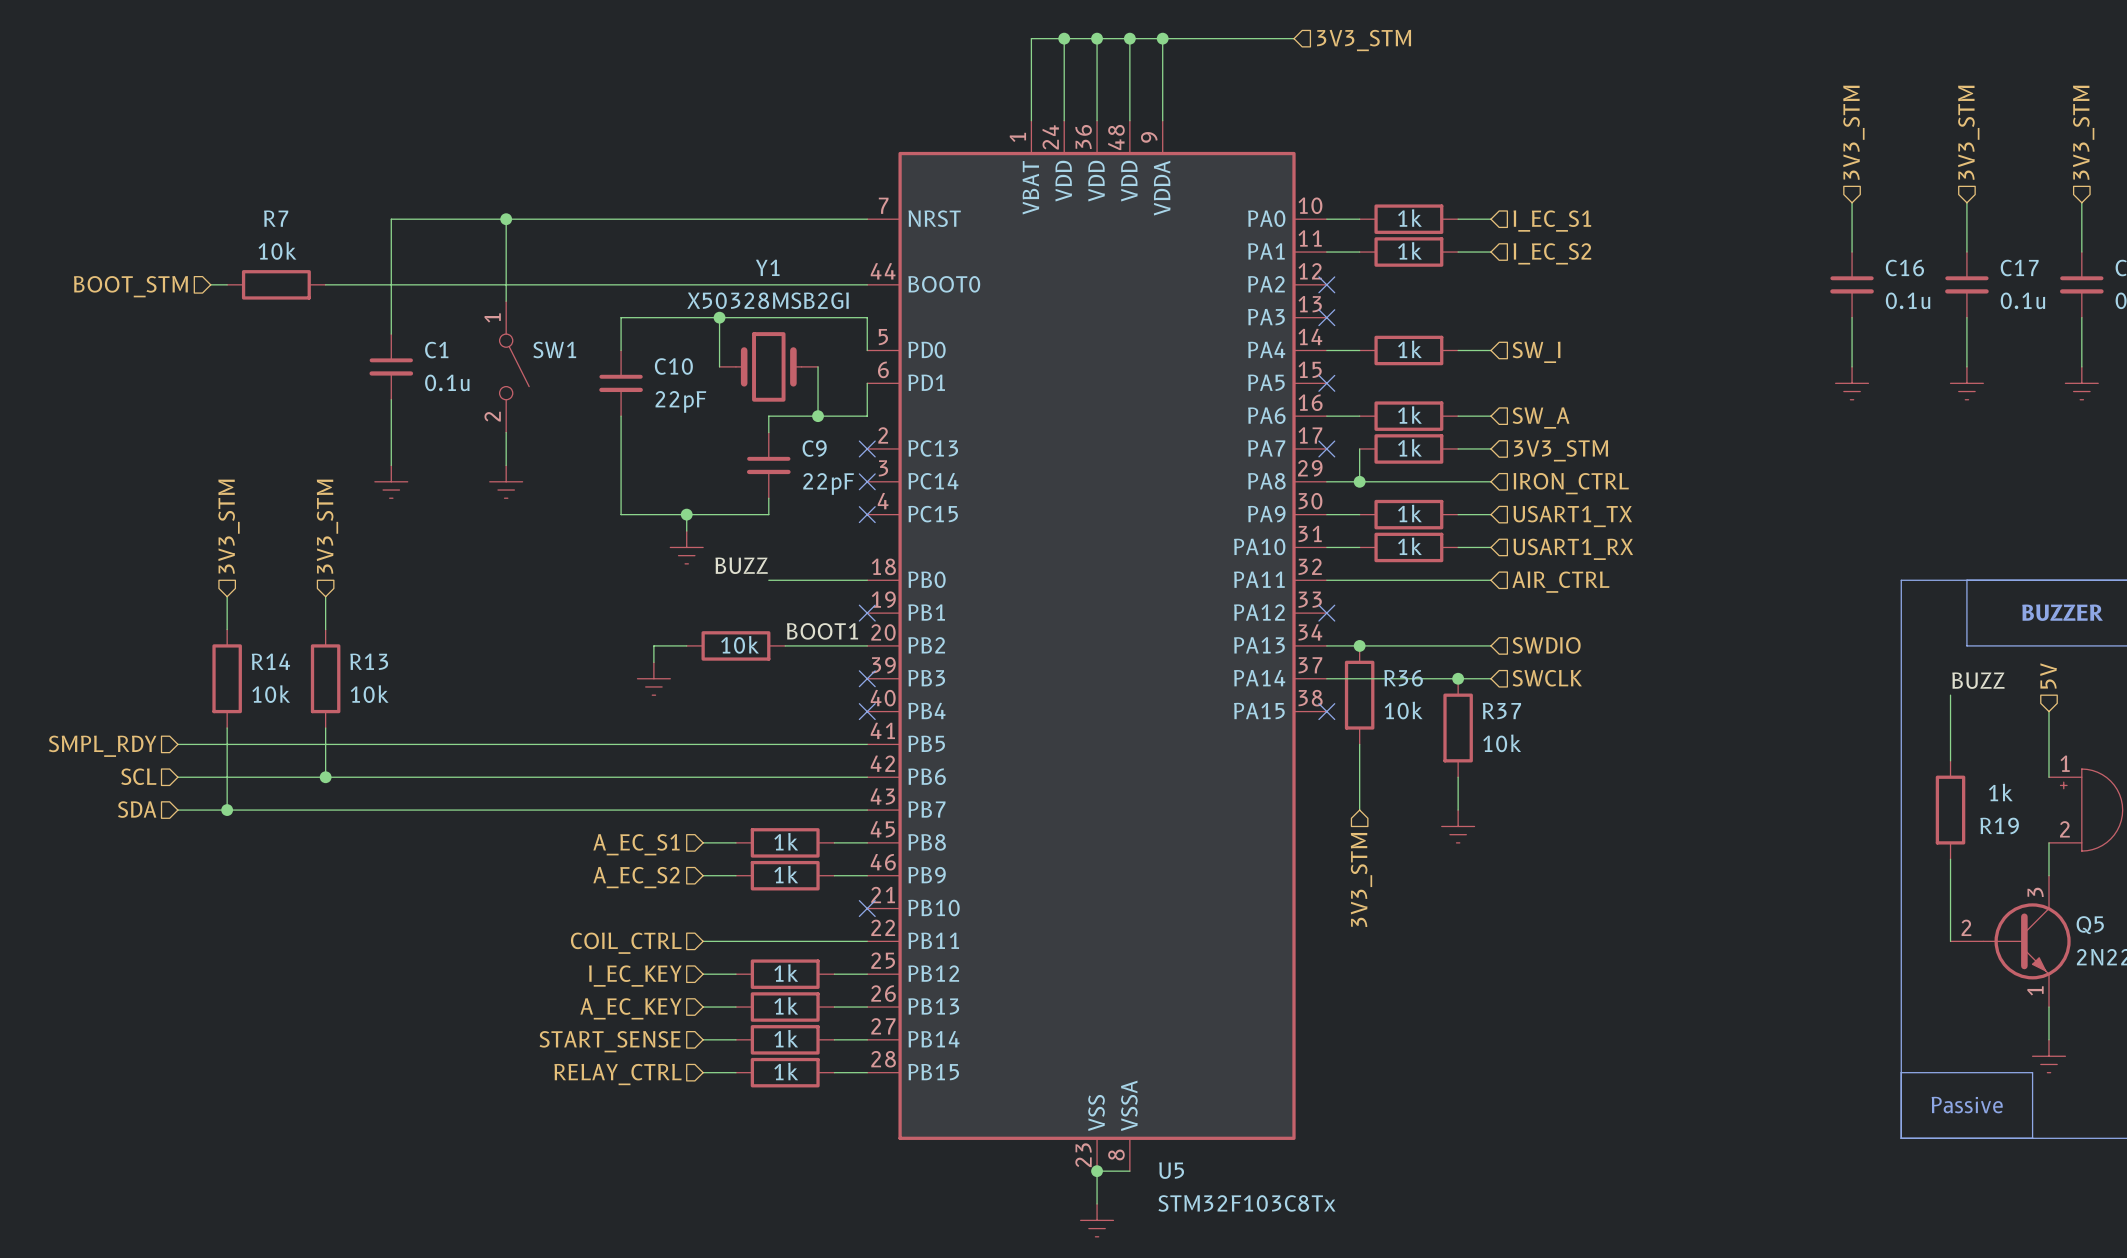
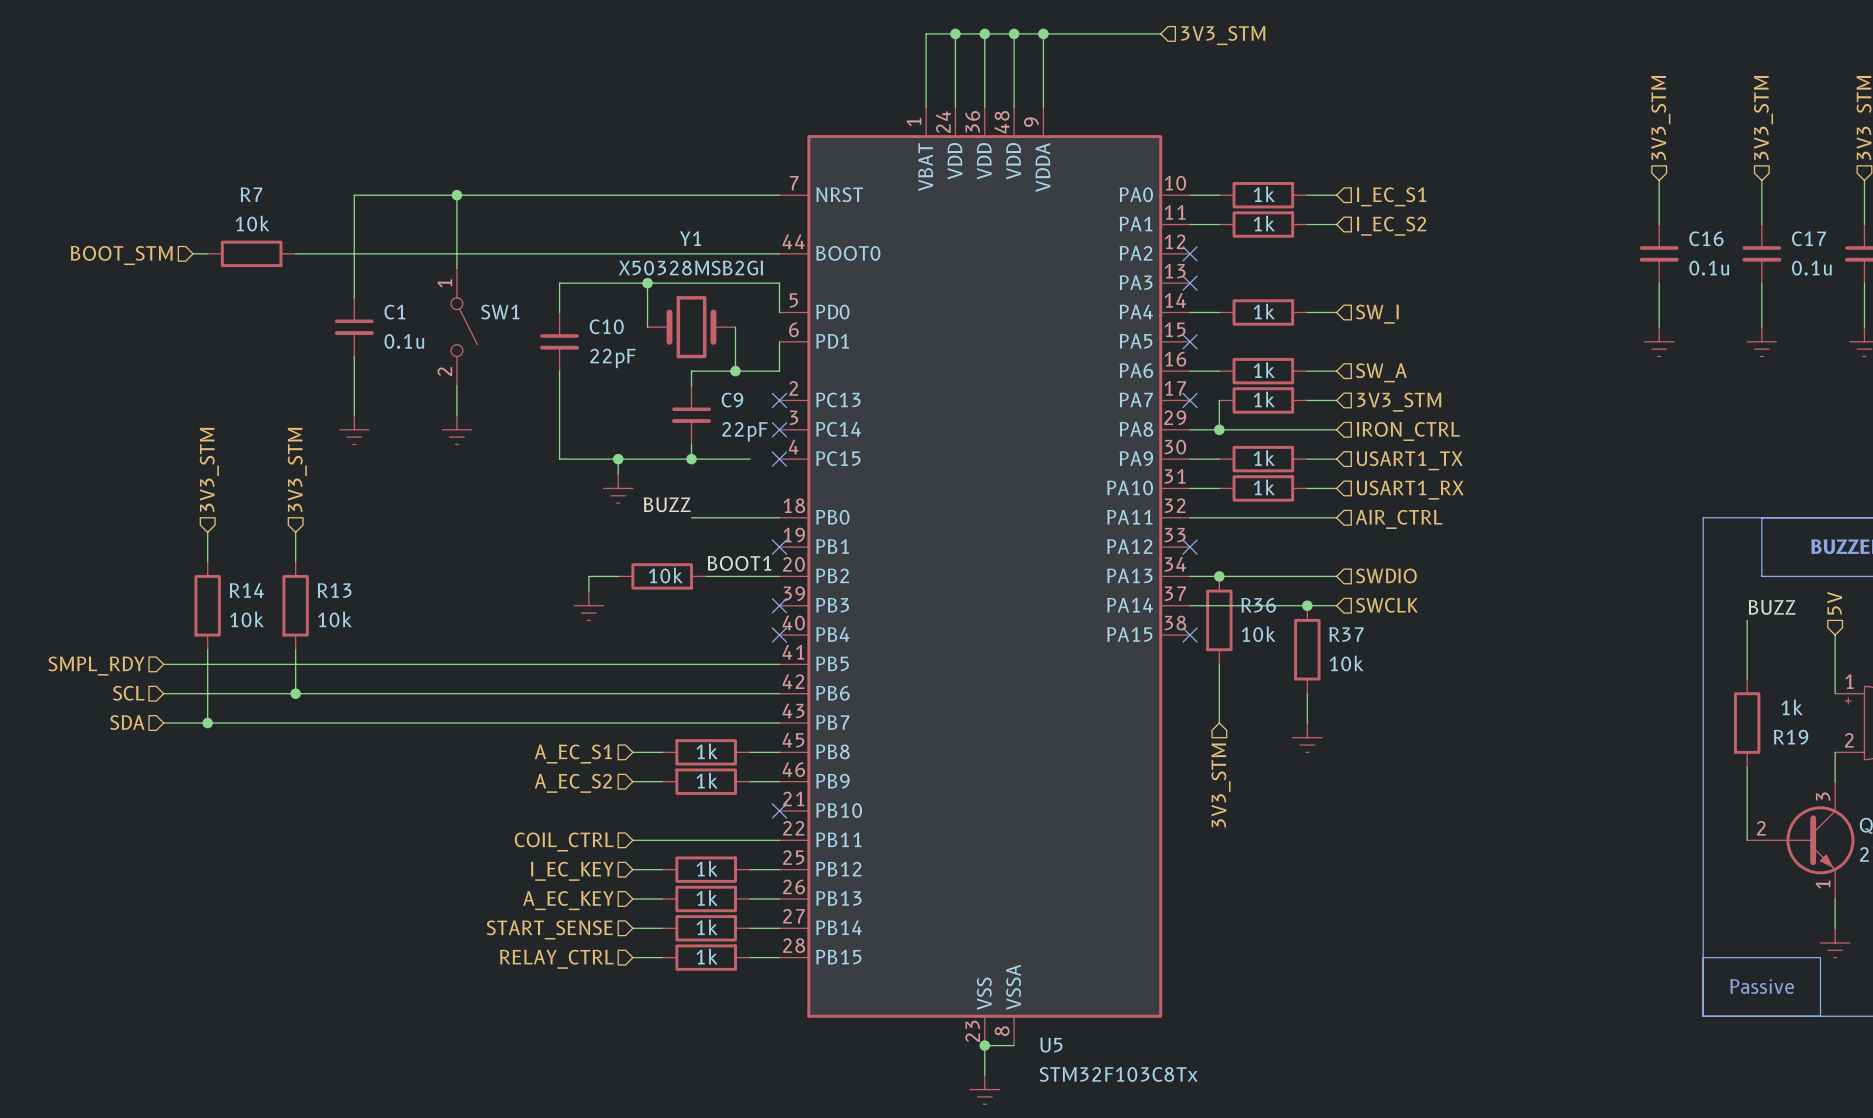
wire: none -> (691, 459) (750, 459)
junction: none -> (691, 459)

